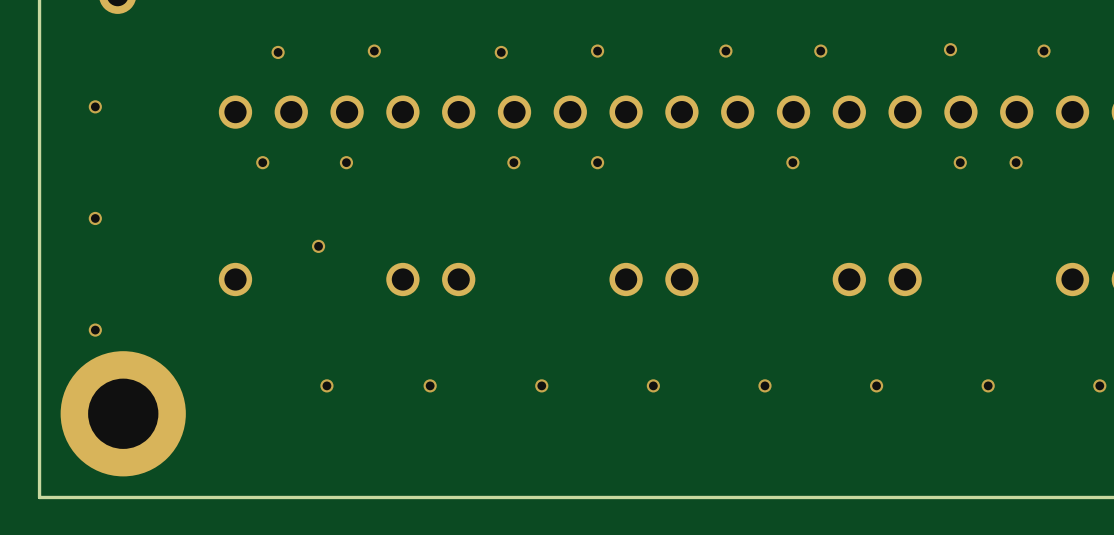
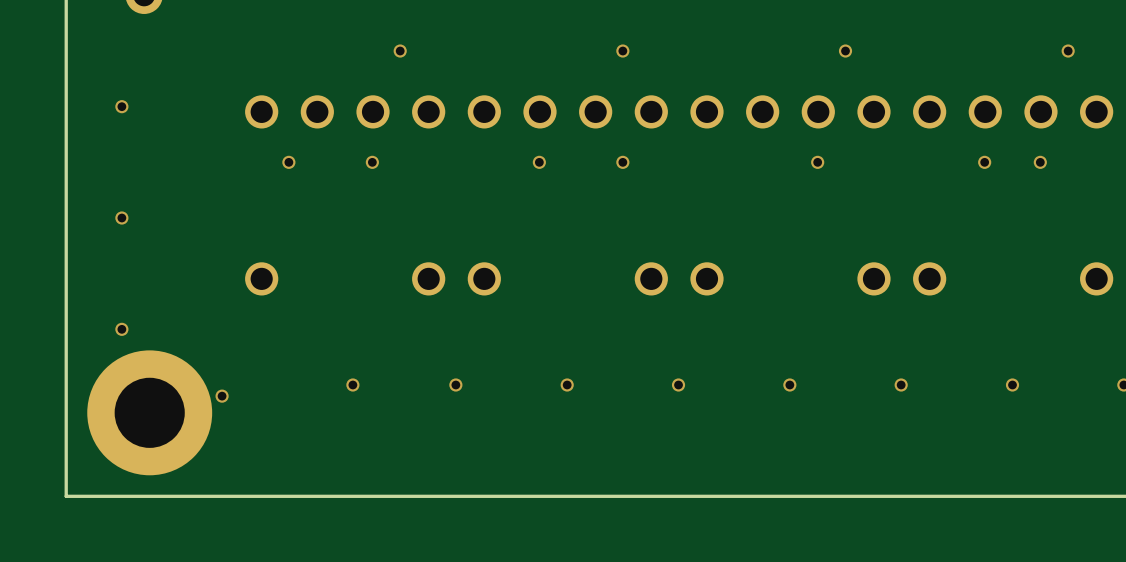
via: (950, 49) -> none
via: (725, 51) -> none
via: (278, 52) -> none
via: (501, 52) -> none
via: (318, 246) -> none
via: none -> (222, 396)

